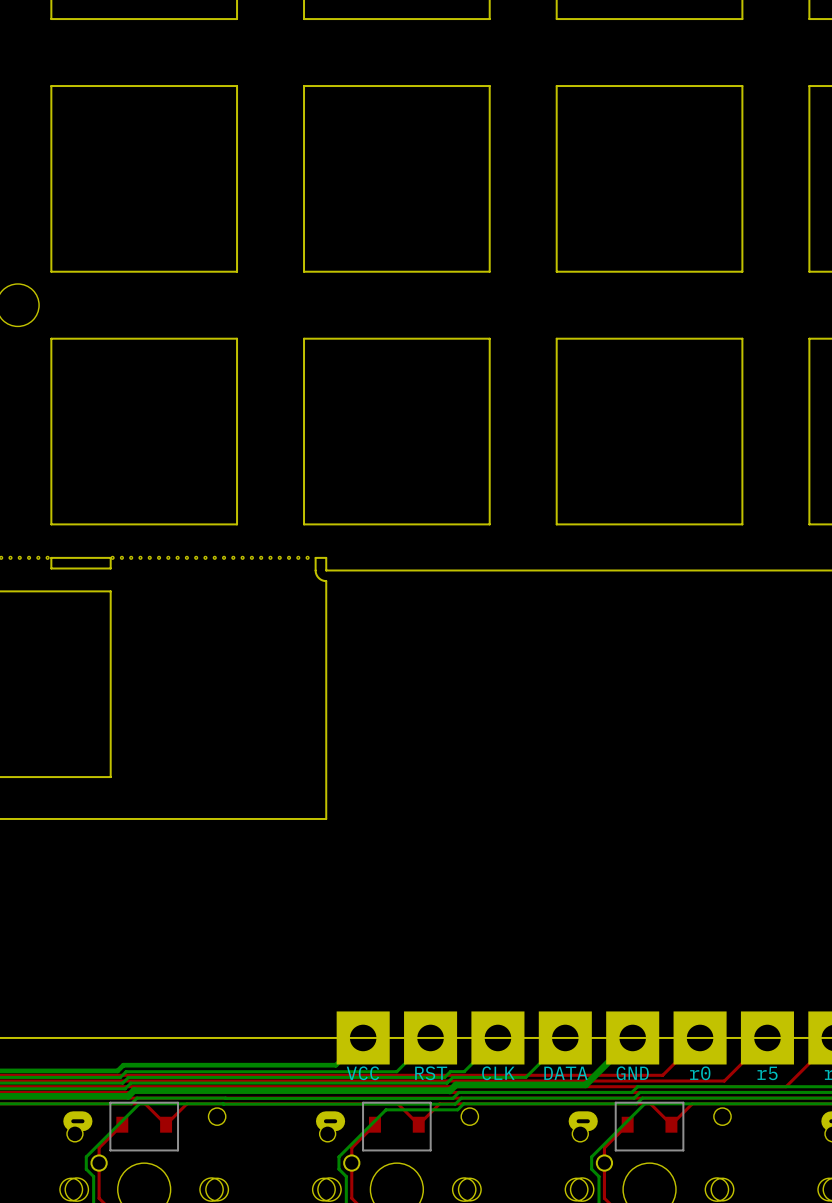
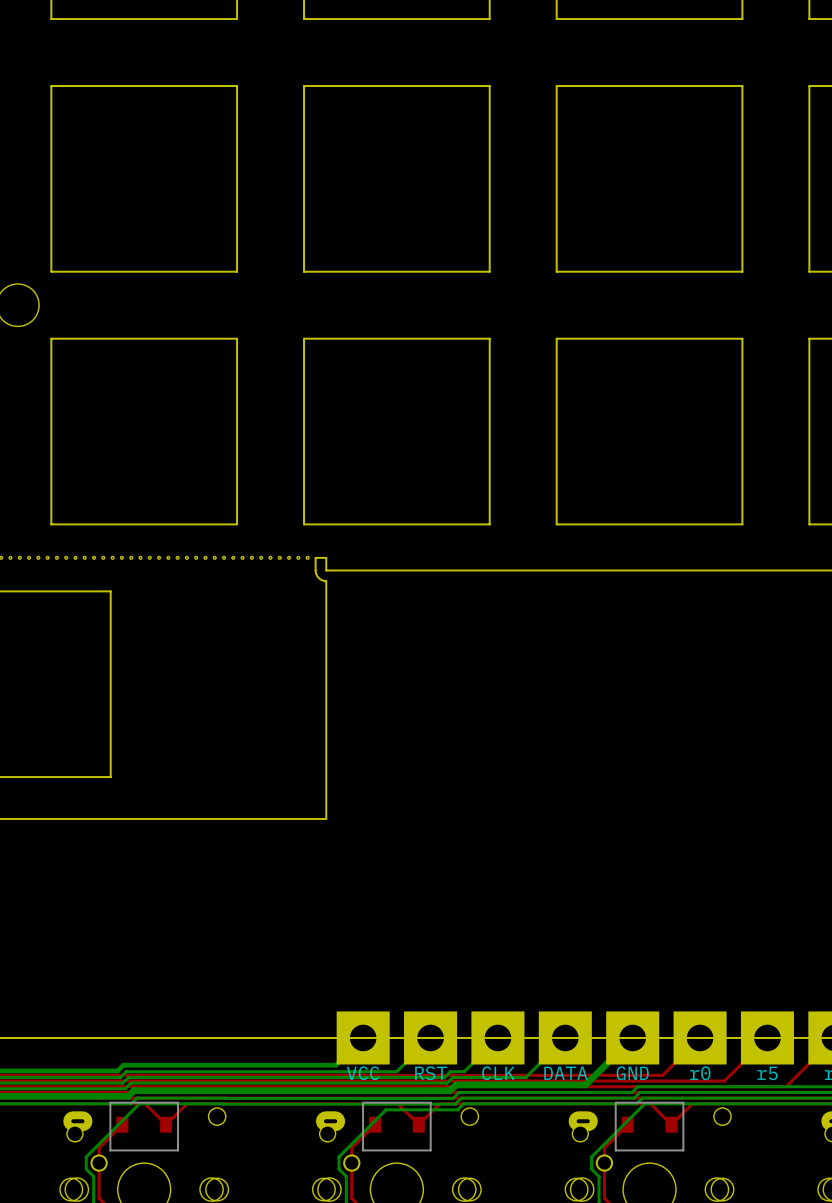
part: none -> (56, 557)
part: none -> (66, 557)
part: none -> (75, 557)
part: none -> (84, 557)
part: none -> (94, 557)
part: none -> (103, 557)
board edge: (110, 557) (51, 557) (51, 568) (110, 568) (110, 557) -> none

